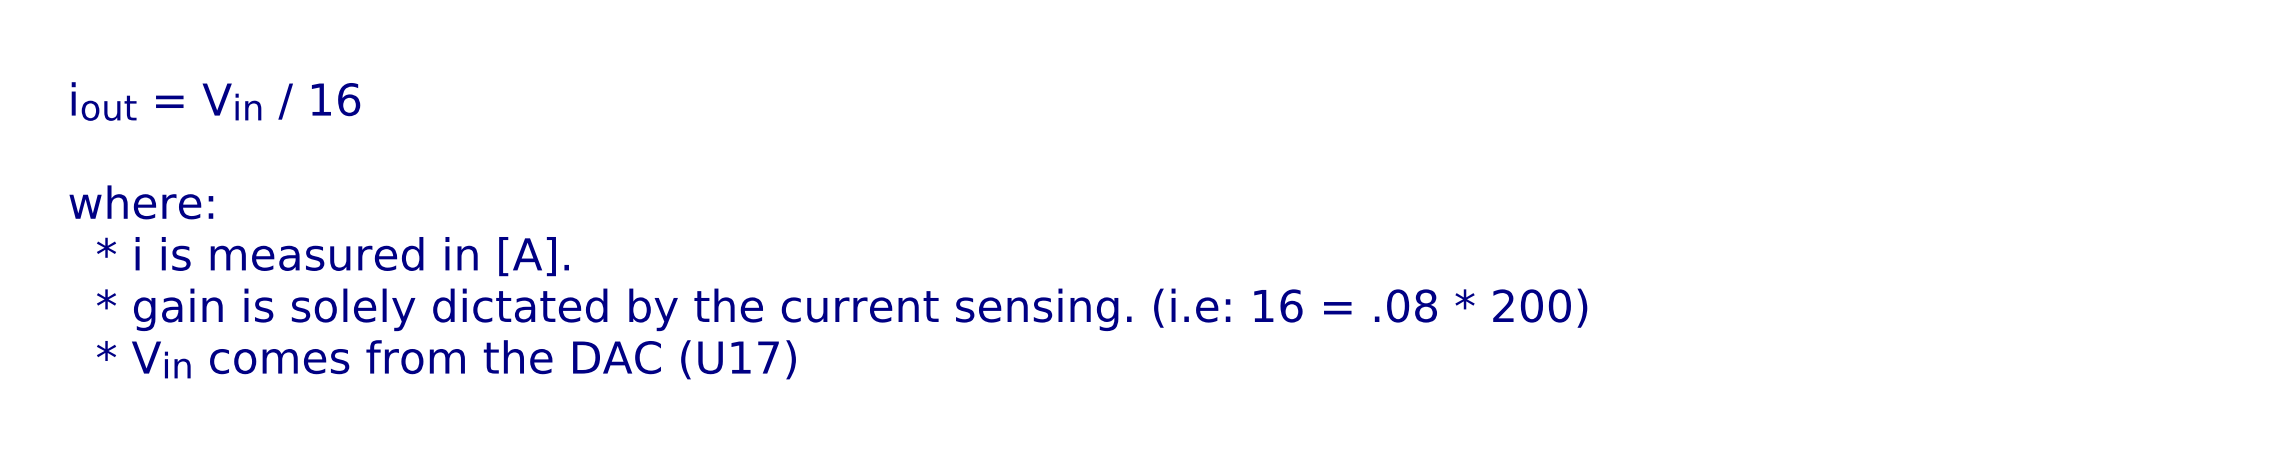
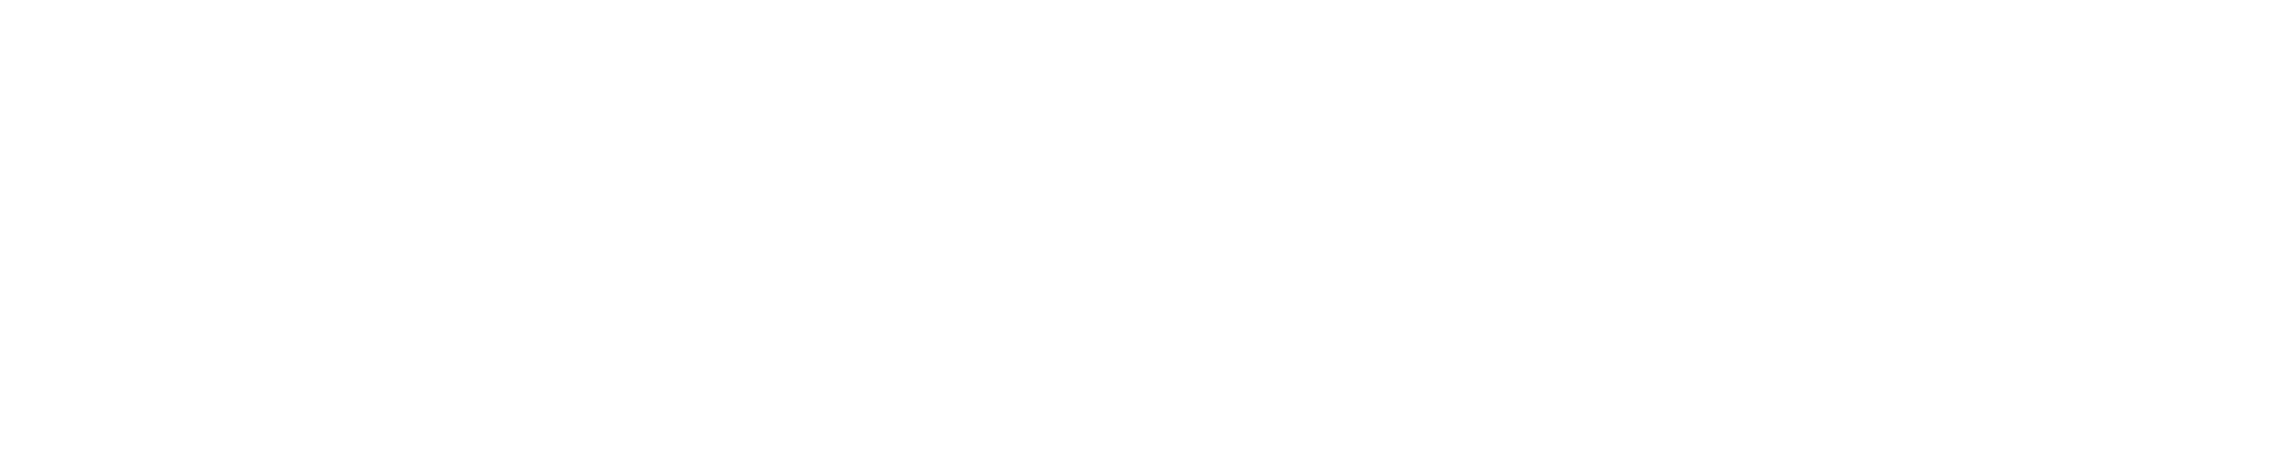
text: iout = Vin / 16 (215, 101) -> none
text: where: (141, 202) -> none
text: * i is measured in [A]. (332, 256) -> none
text: * gain is solely dictated by the current sensing. (i.e: 16 = .08 * 200) (842, 309) -> none
text: * Vin comes from the DAC (U17) (446, 359) -> none

